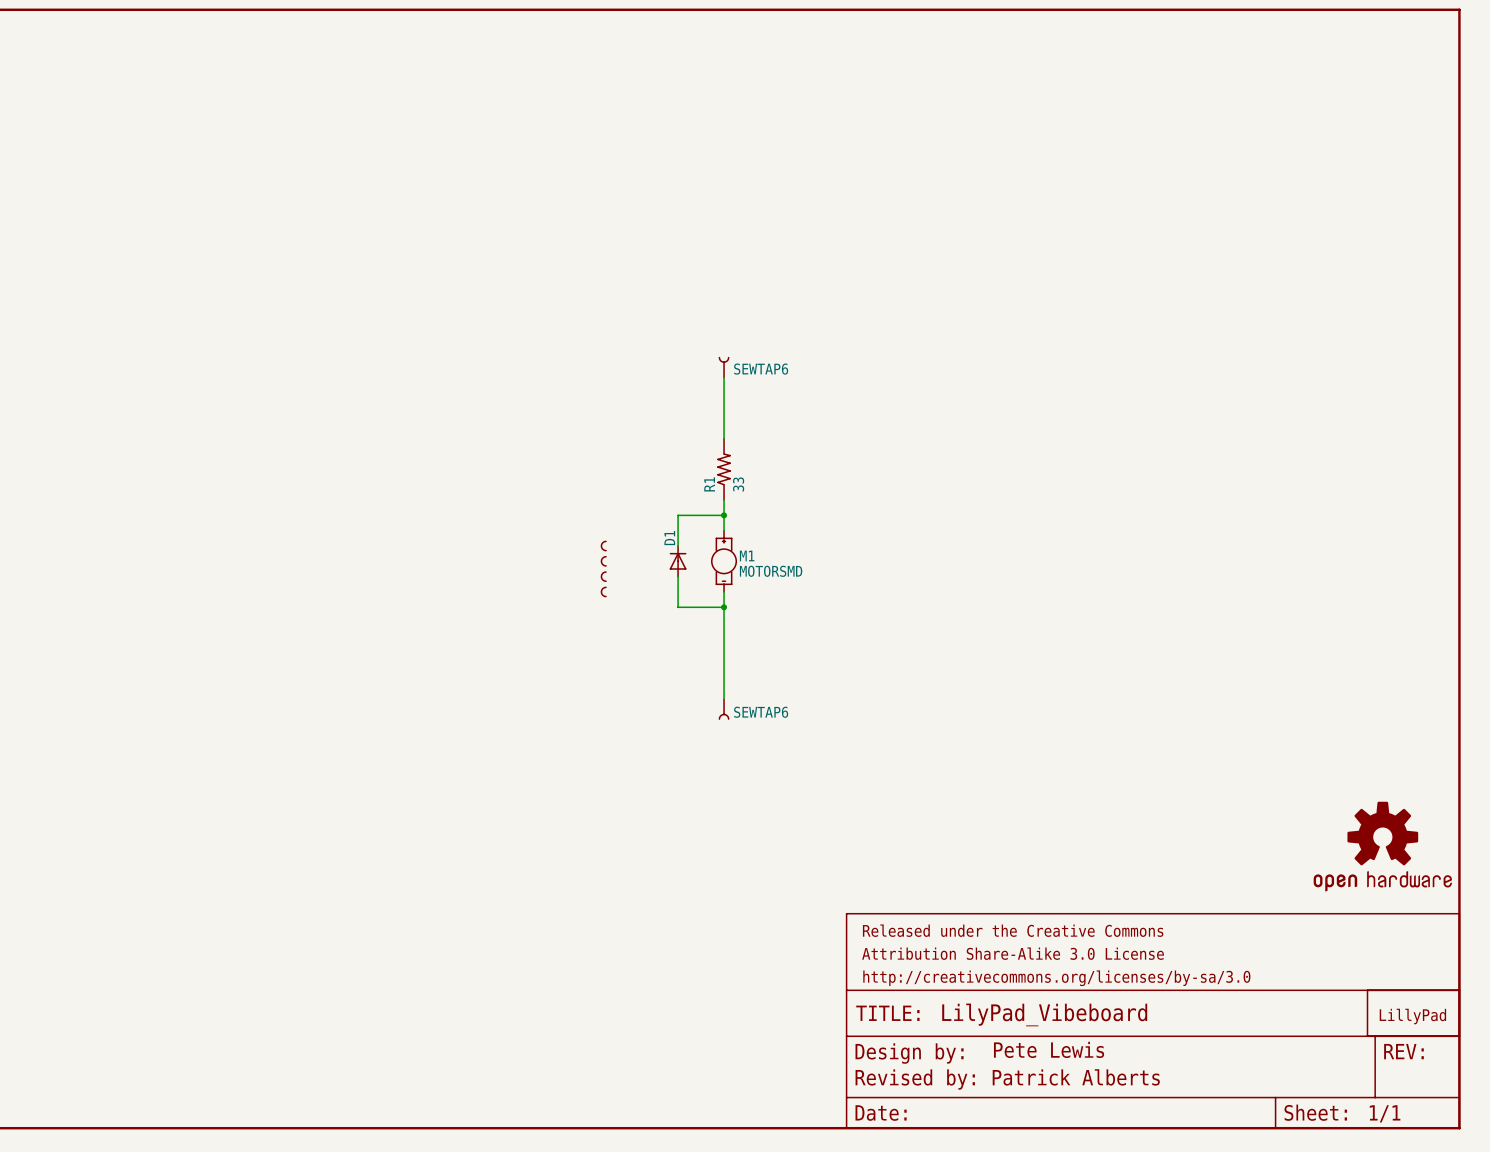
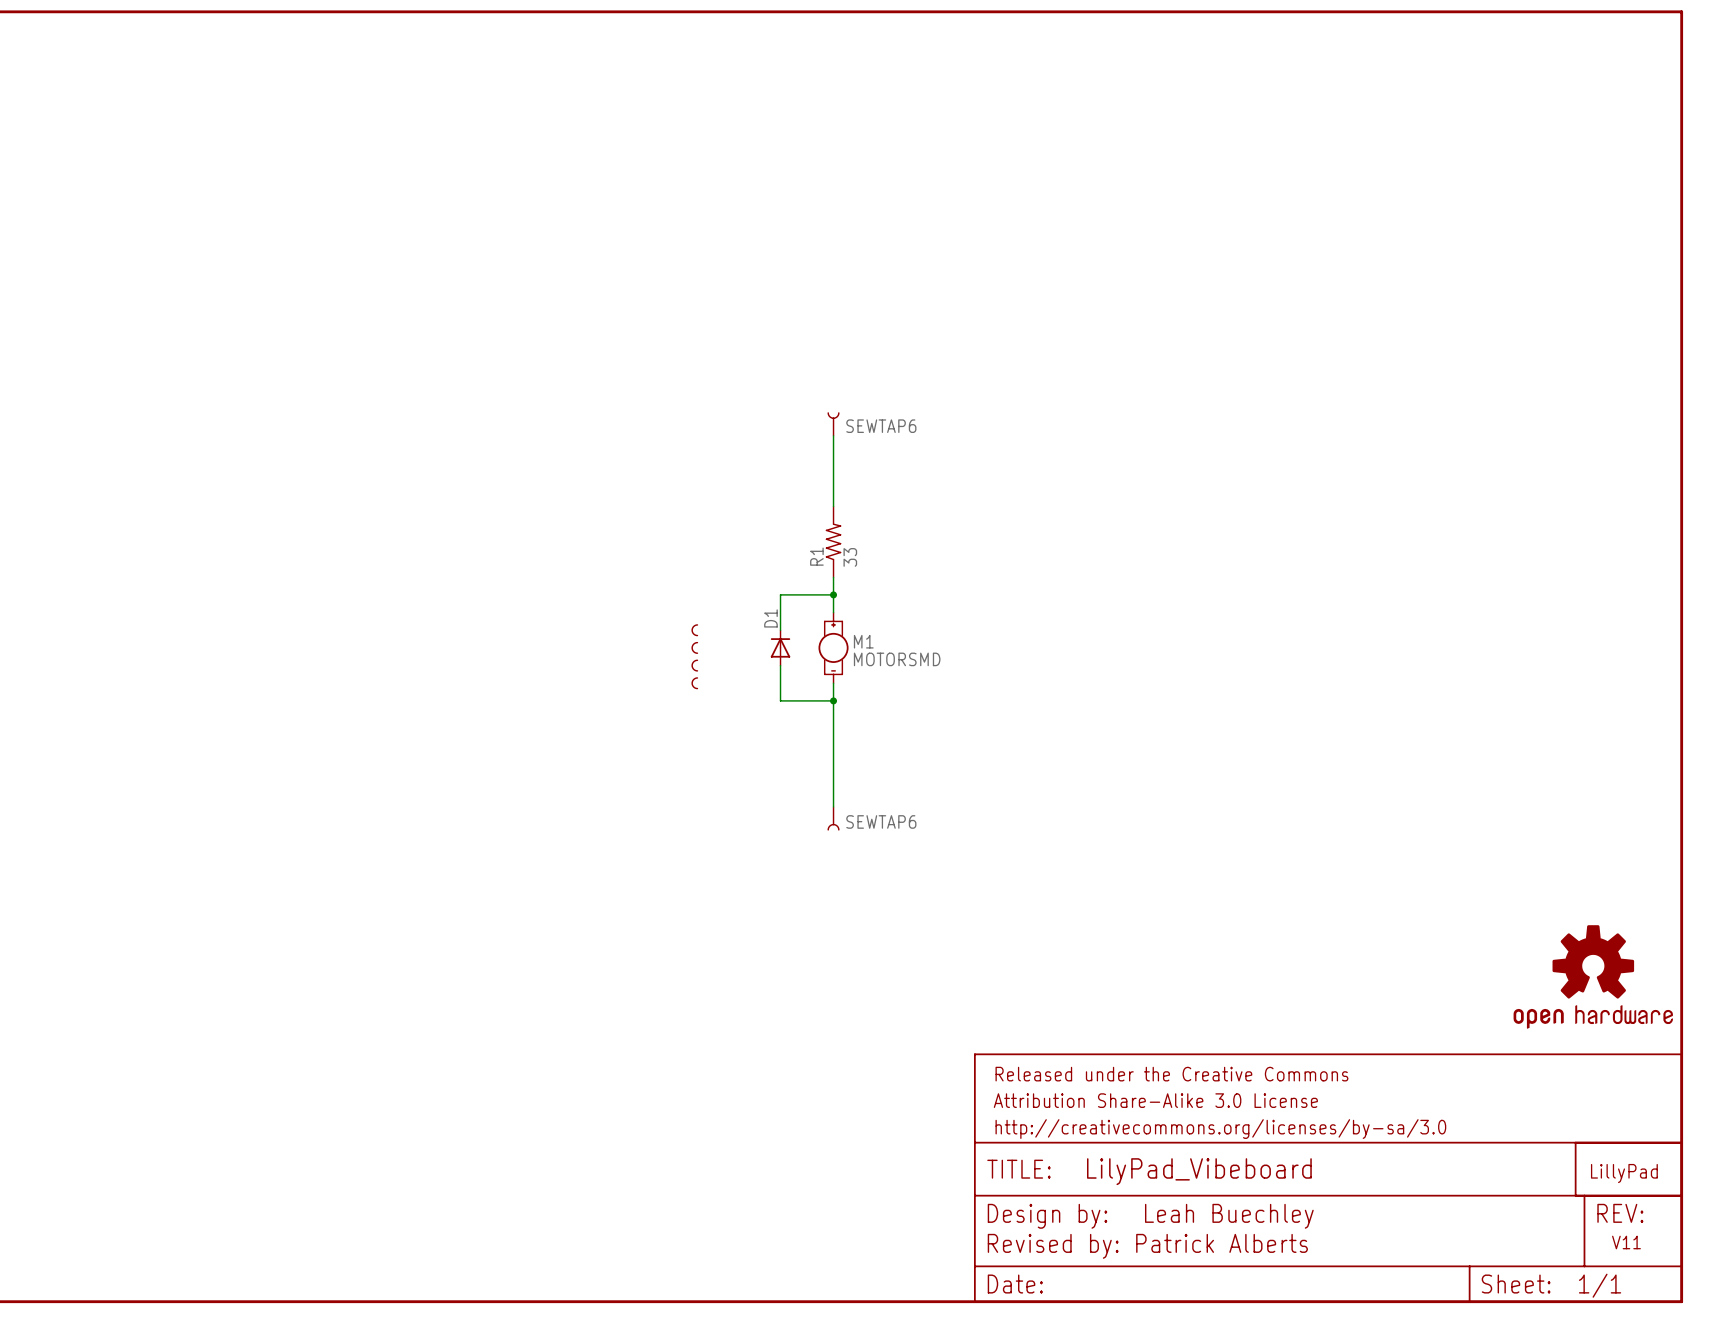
text: Pete Lewis (1049, 1049) -> Leah Buechley (1229, 1216)
text: none -> V11 (1626, 1242)

